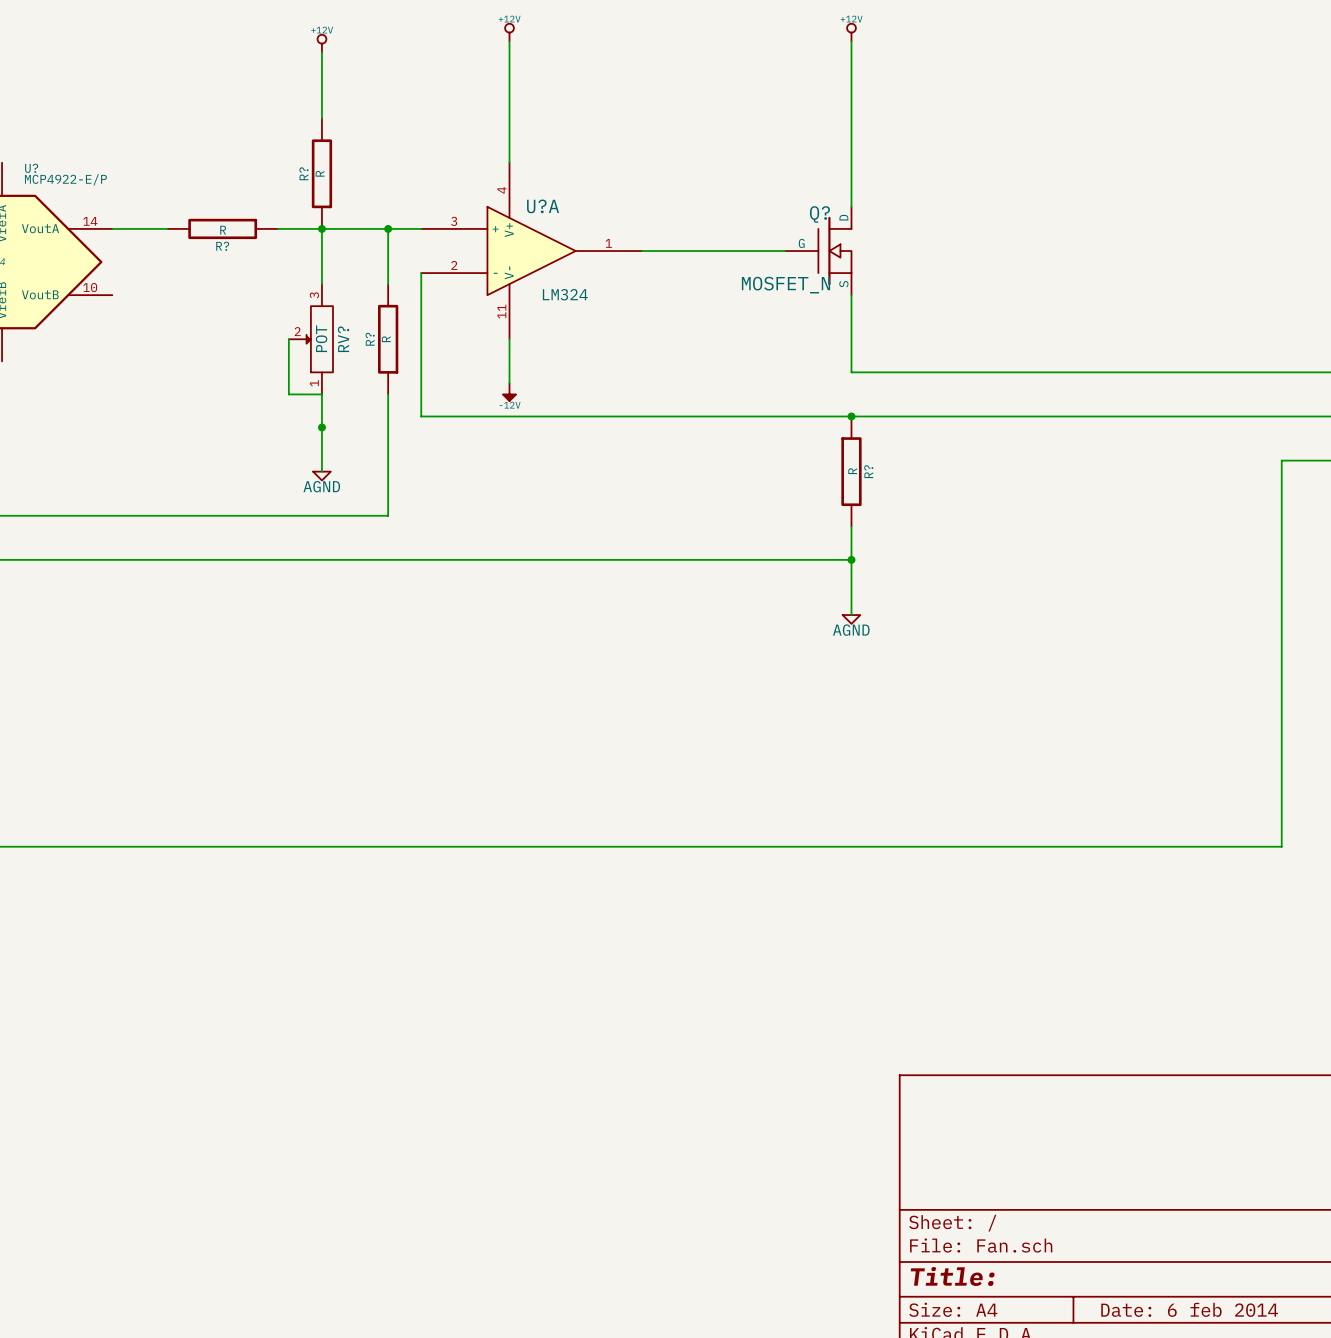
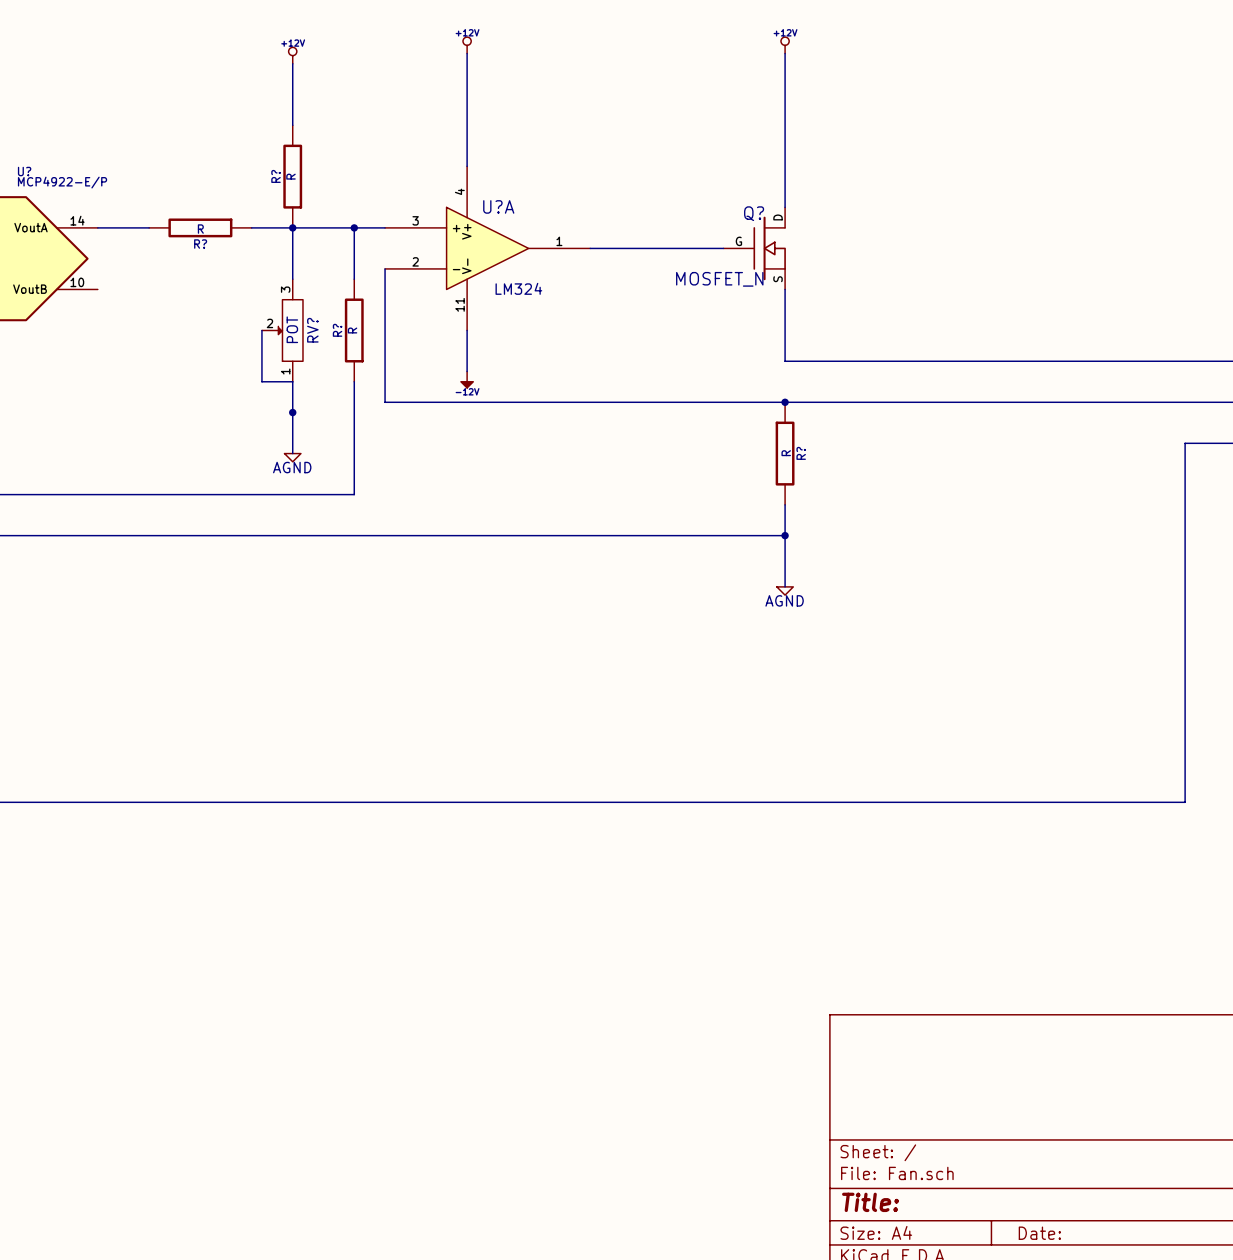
title block: Date: 6 feb 2014 (1189, 1309) -> Date: (1039, 1233)

